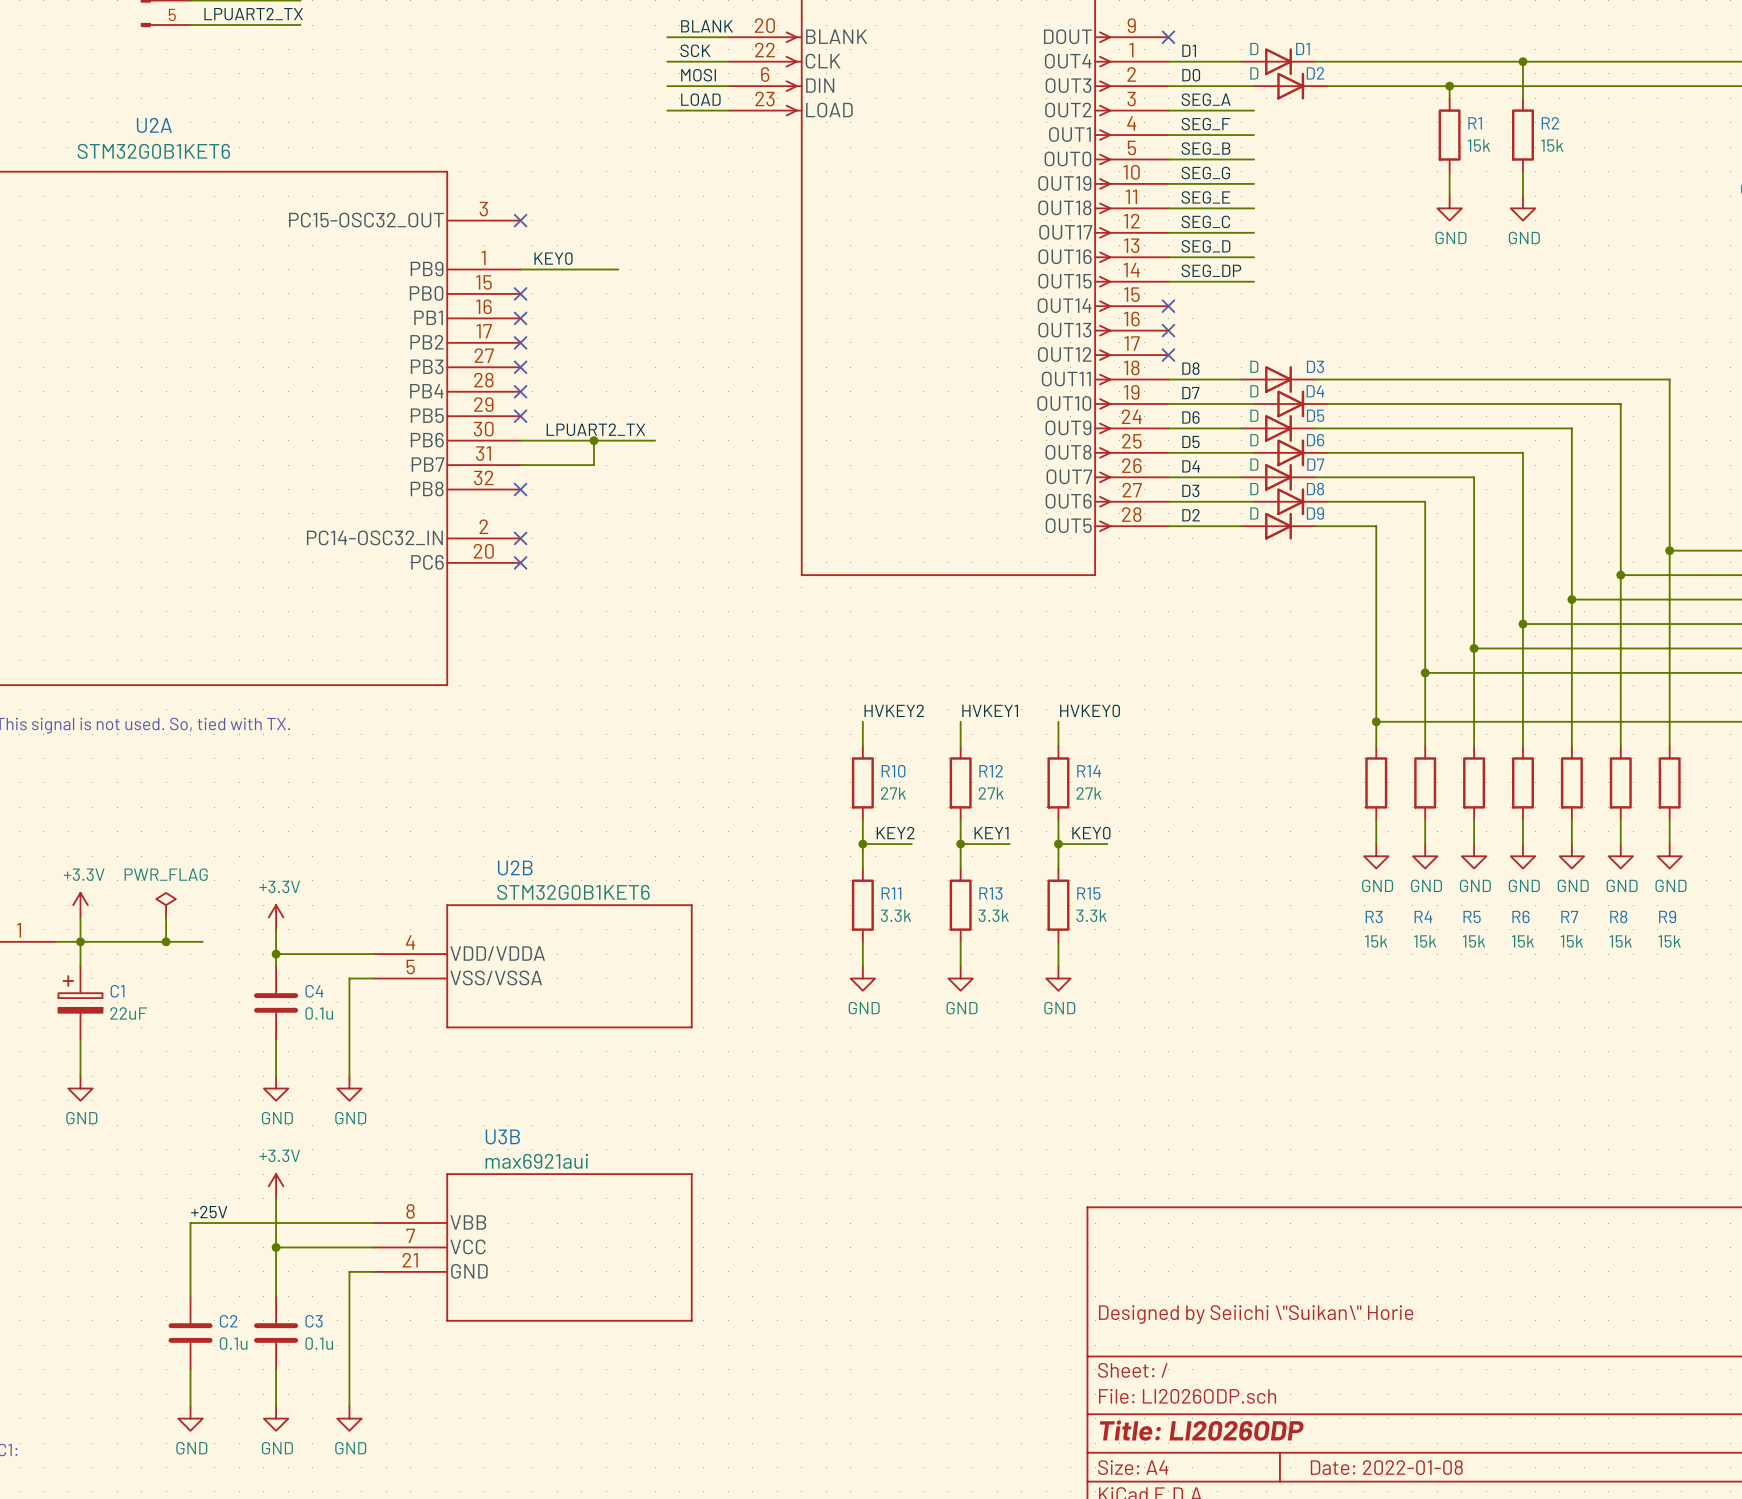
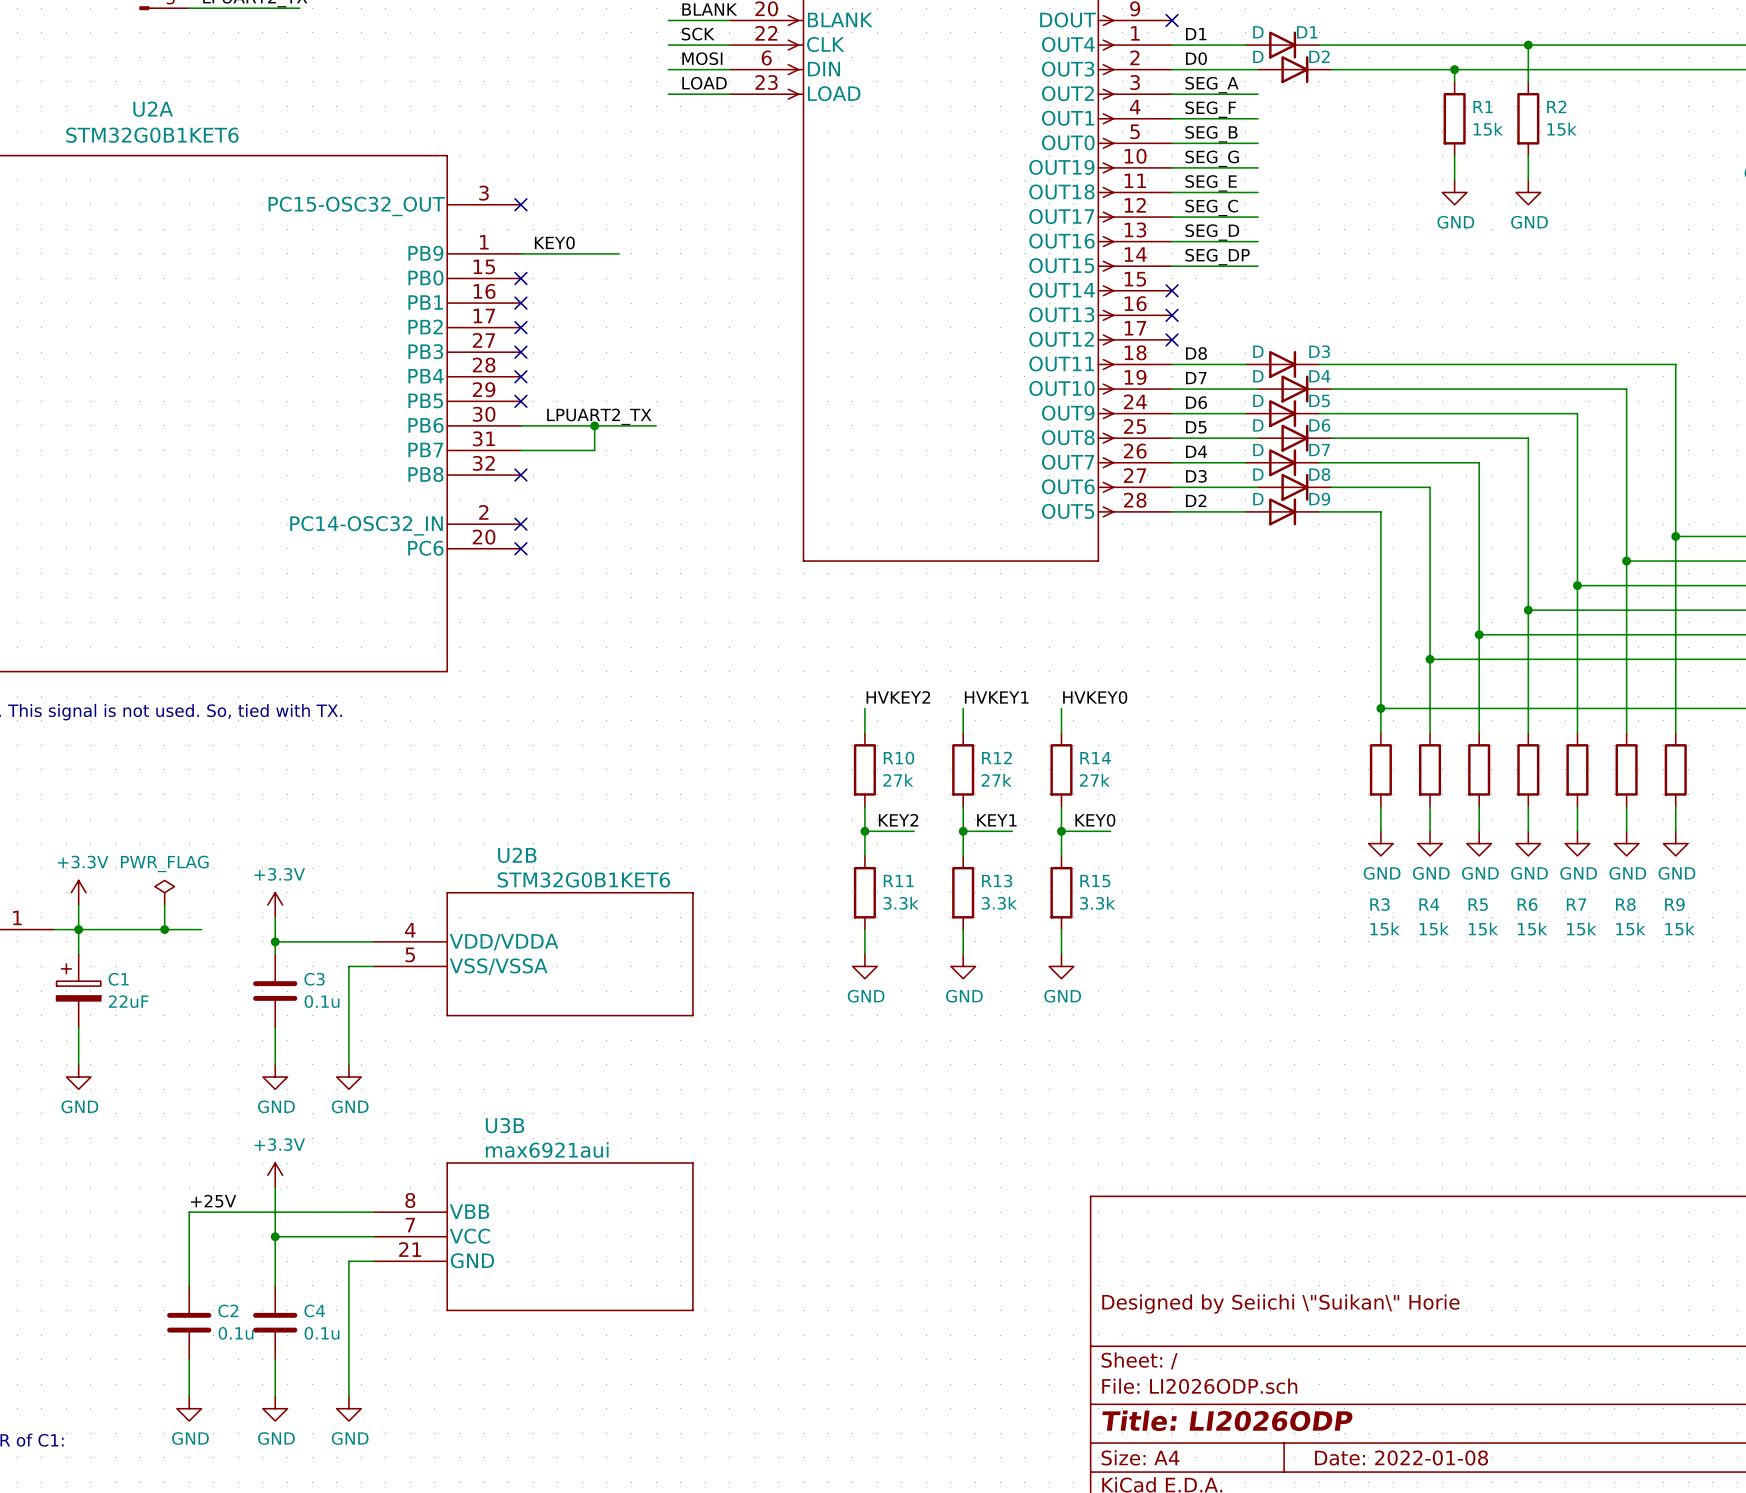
C4 name: C4 (314, 991) -> C3 (314, 979)
C3 name: C3 (314, 1321) -> C4 (314, 1310)

